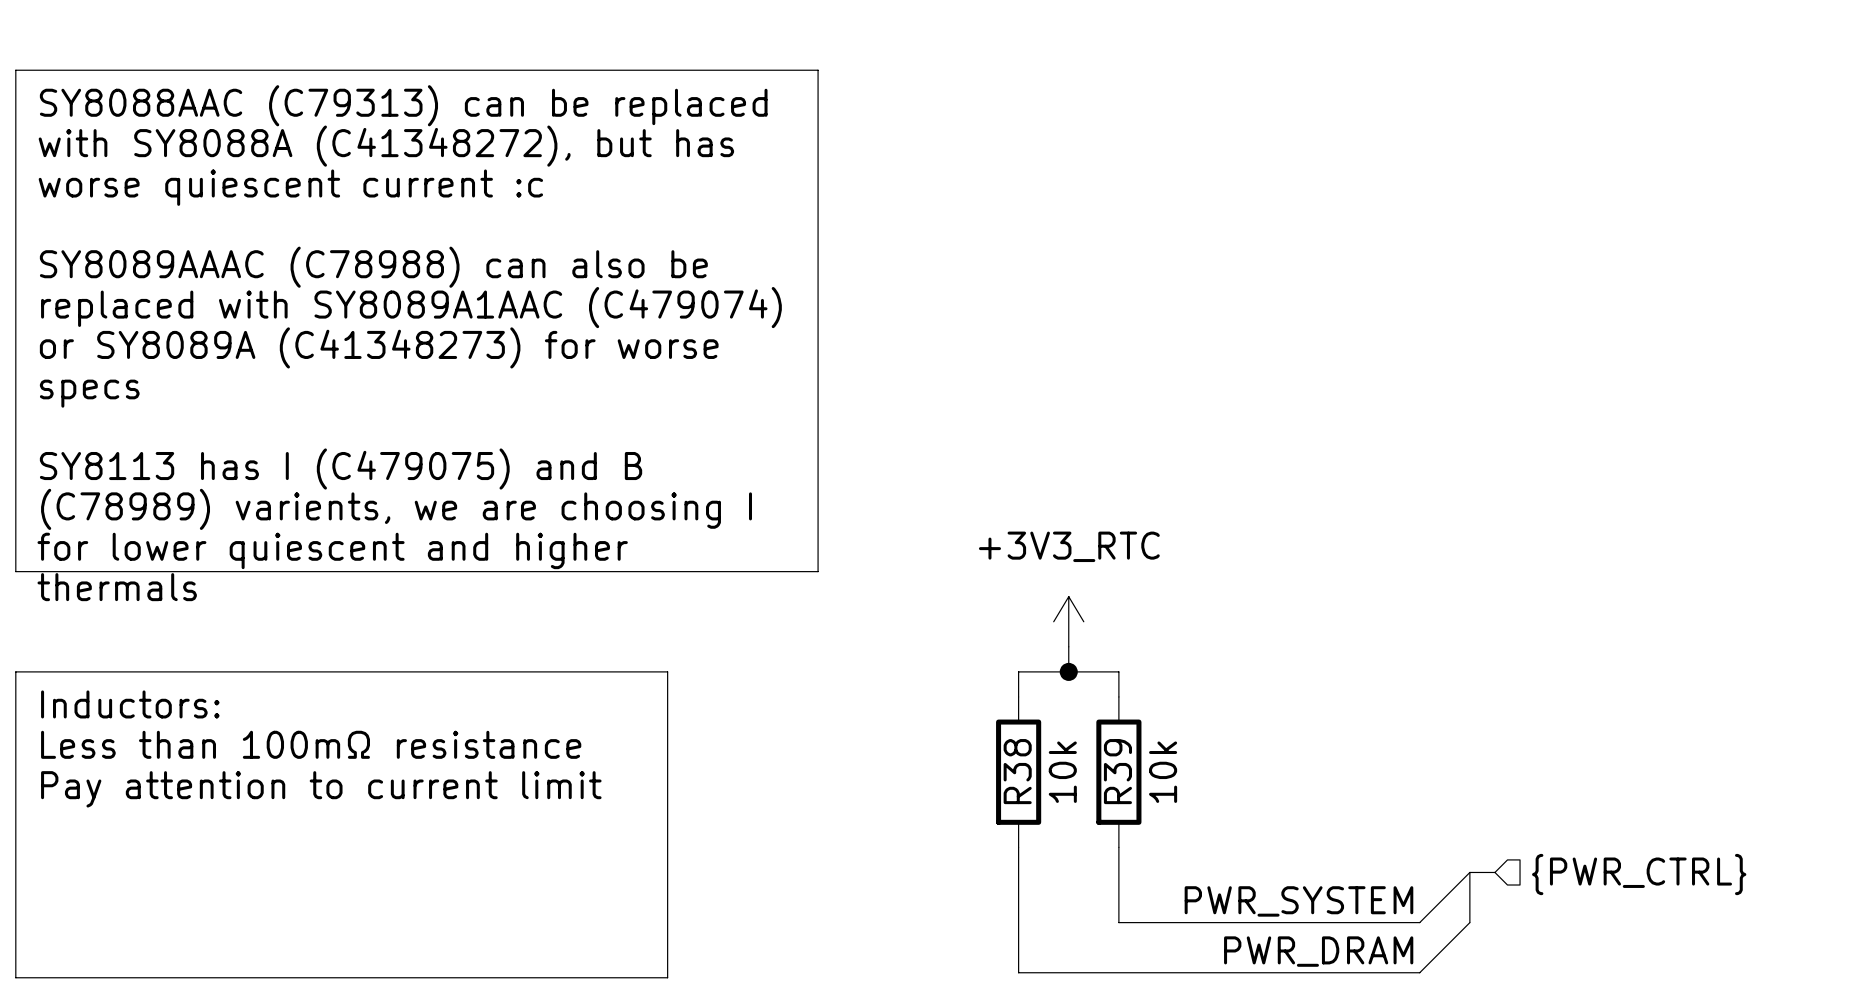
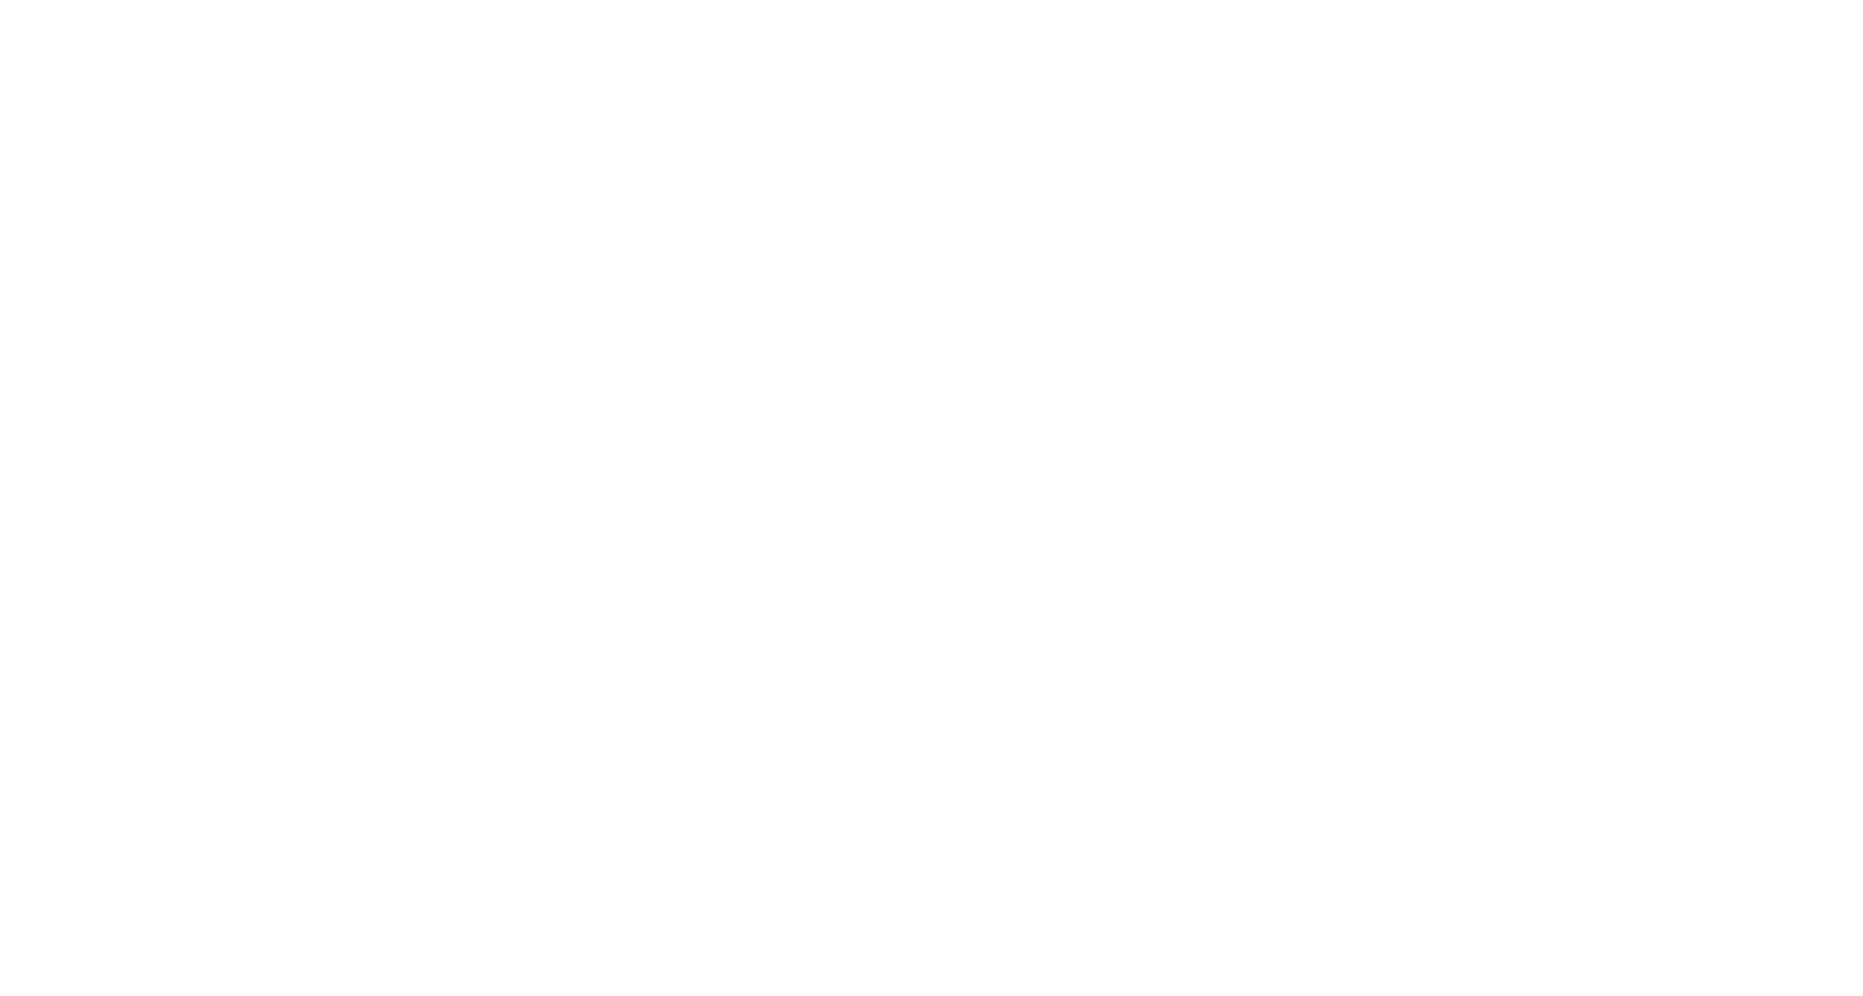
line: (15, 70) (818, 70) (818, 571) (15, 571) (15, 70) -> none
text: SY8088AAC (C79313) can be replaced (403, 105) -> none
text: with SY8088A (C41348272), but has (386, 146) -> none
text: worse quiescent current :c (290, 187) -> none
text: SY8089AAAC (C78988) can also be (373, 267) -> none
text: replaced with SY8089A1AAC (C479074) (411, 307) -> none
text: or SY8089A (C41348273) for worse (379, 347) -> none
text: specs (89, 393) -> none
text: SY8113 has I (C479075) and B (341, 469) -> none
text: (C78989) varients, we are choosing I (396, 509) -> none
text: for lower quiescent and higher (332, 550) -> none
text: thermals (117, 587) -> none
power symbol: +3V3_RTC (1068, 621) -> none
wire: (1068, 646) (1068, 671) -> none
line: (15, 671) (15, 977) (667, 977) (667, 671) (15, 671) -> none
junction: (1068, 671) -> none
wire: (1018, 696) (1018, 671) (1118, 671) (1118, 696) -> none
text: Inductors: (130, 704) -> none
text: Less than 100mΩ resistance (311, 744) -> none
R38: 10k (1018, 772) -> none
R39: 10k (1118, 772) -> none
text: Pay attention to current limit (321, 789) -> none
wire: (1018, 847) (1018, 972) (1419, 972) (1469, 922) -> none
wire: (1118, 847) (1118, 922) (1419, 922) (1469, 872) -> none
bus: (1494, 872) (1469, 872) (1469, 922) -> none
hierarchical label: {PWR_CTRL} (1639, 874) -> none
label: PWR_SYSTEM (1298, 901) -> none
label: PWR_DRAM (1318, 951) -> none

